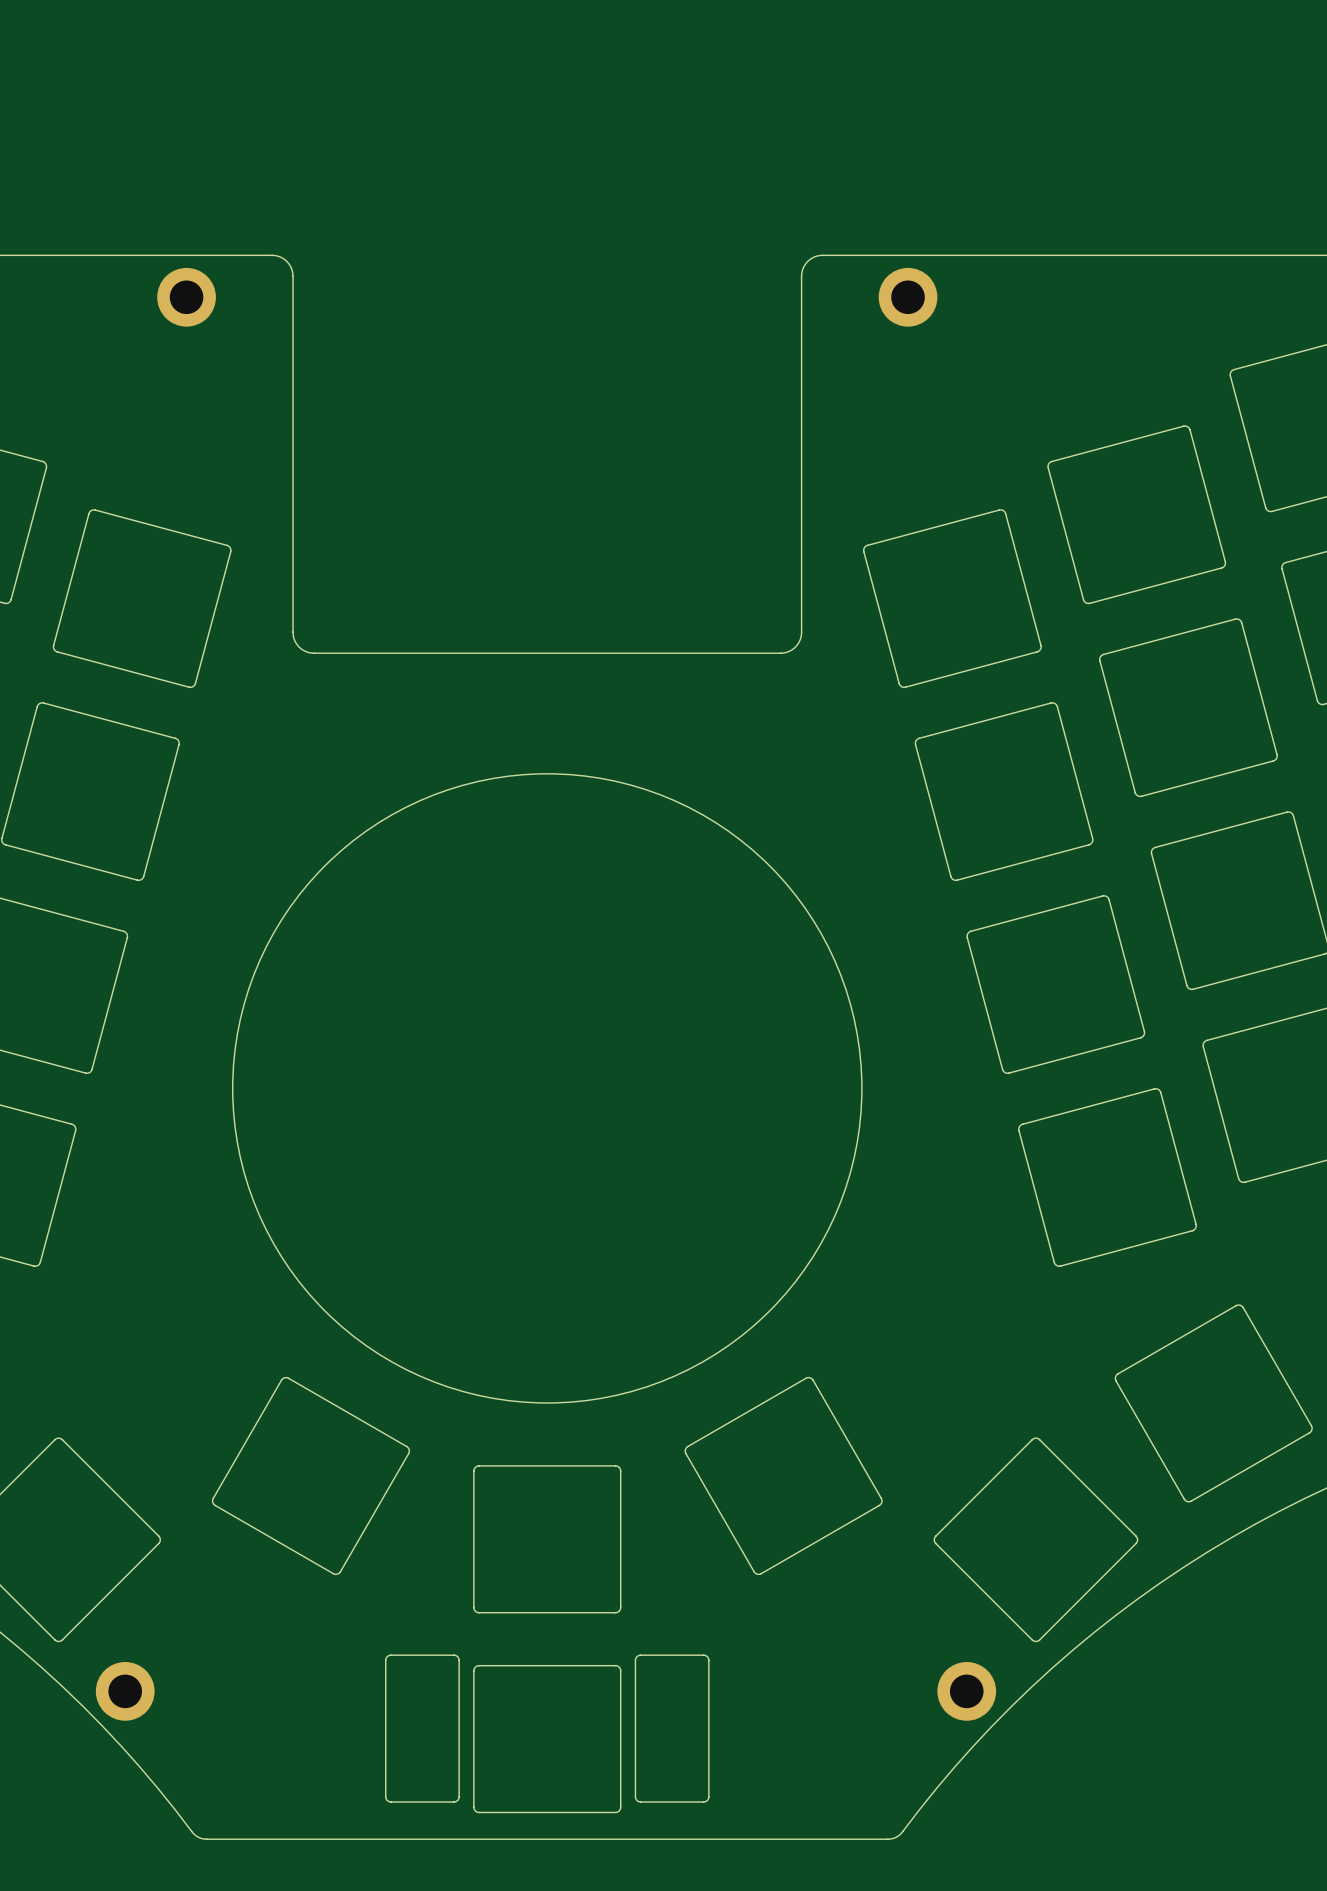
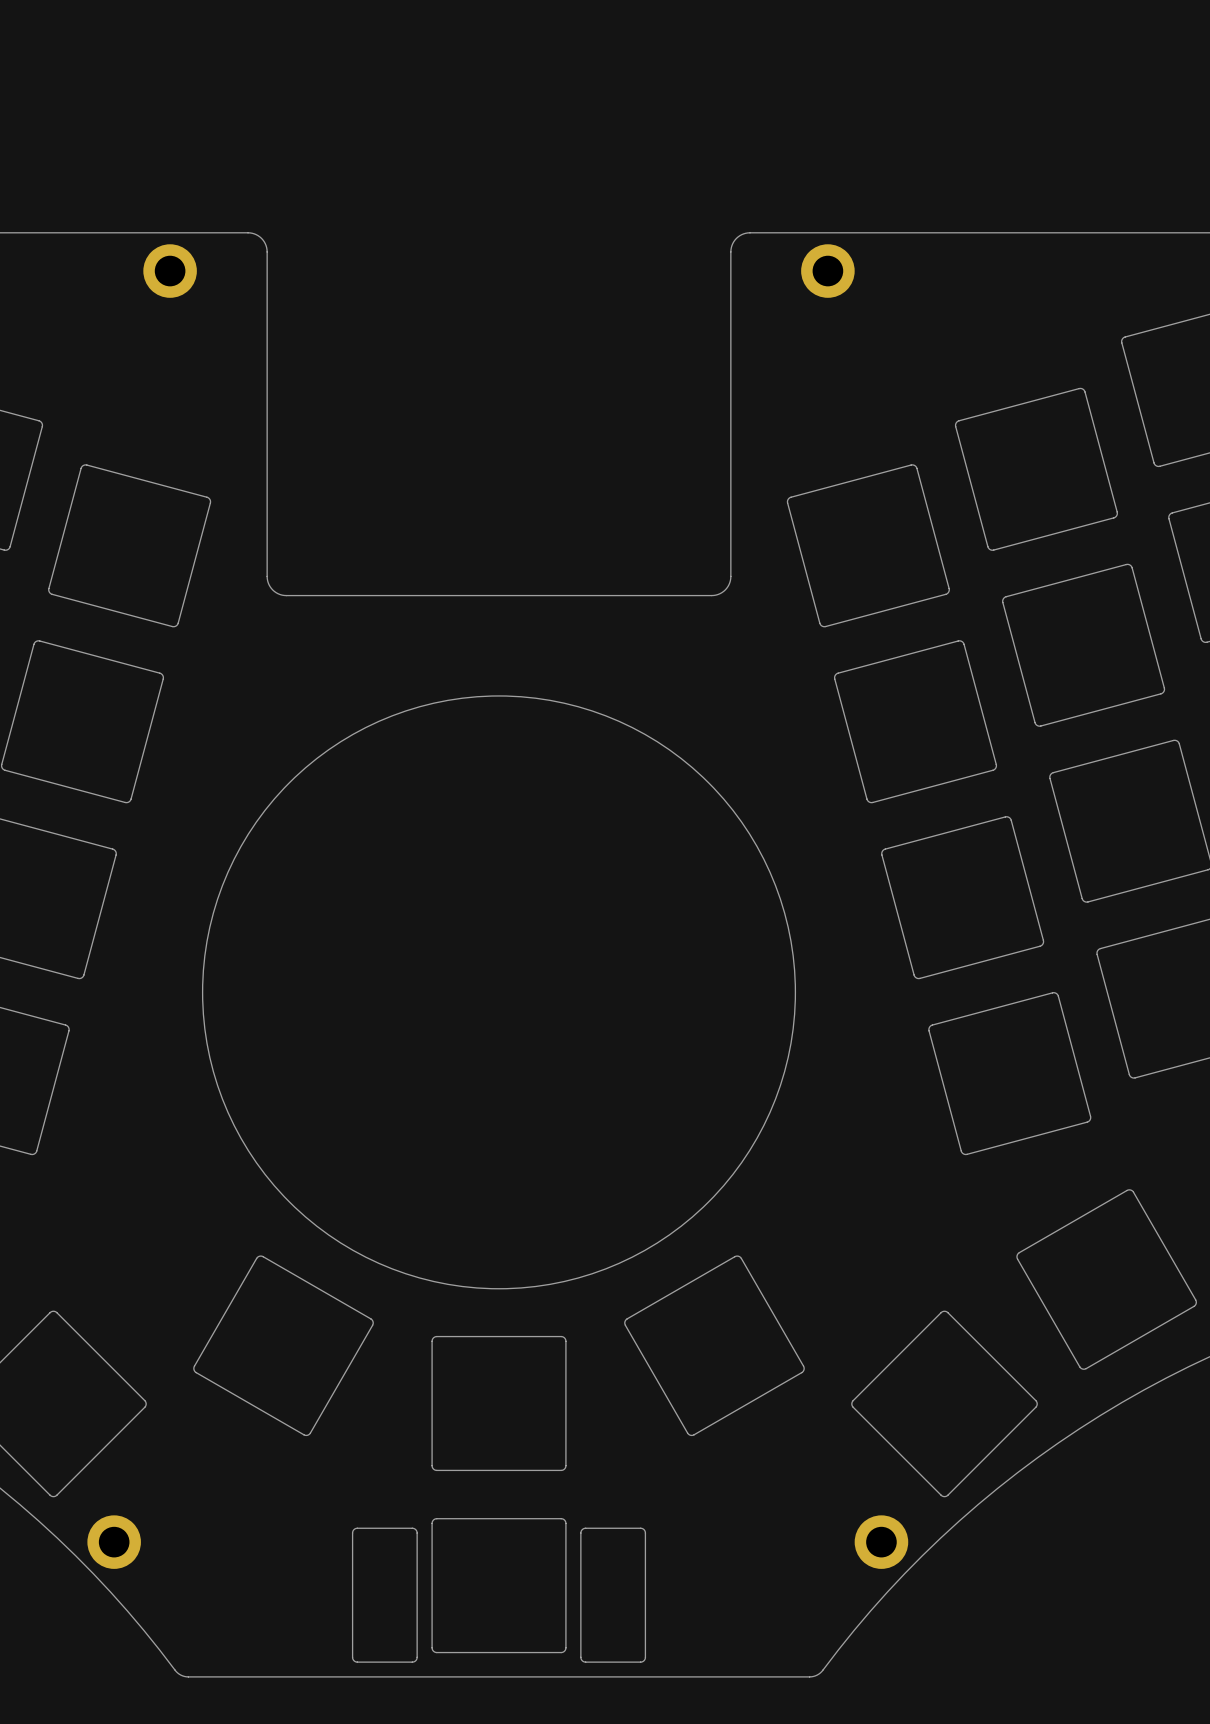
round board edge size: [232, 773, 863, 1404] -> [202, 695, 796, 1290]
drawing: [385, 1654, 710, 1814] -> none
drawing: none -> [352, 1518, 646, 1663]

